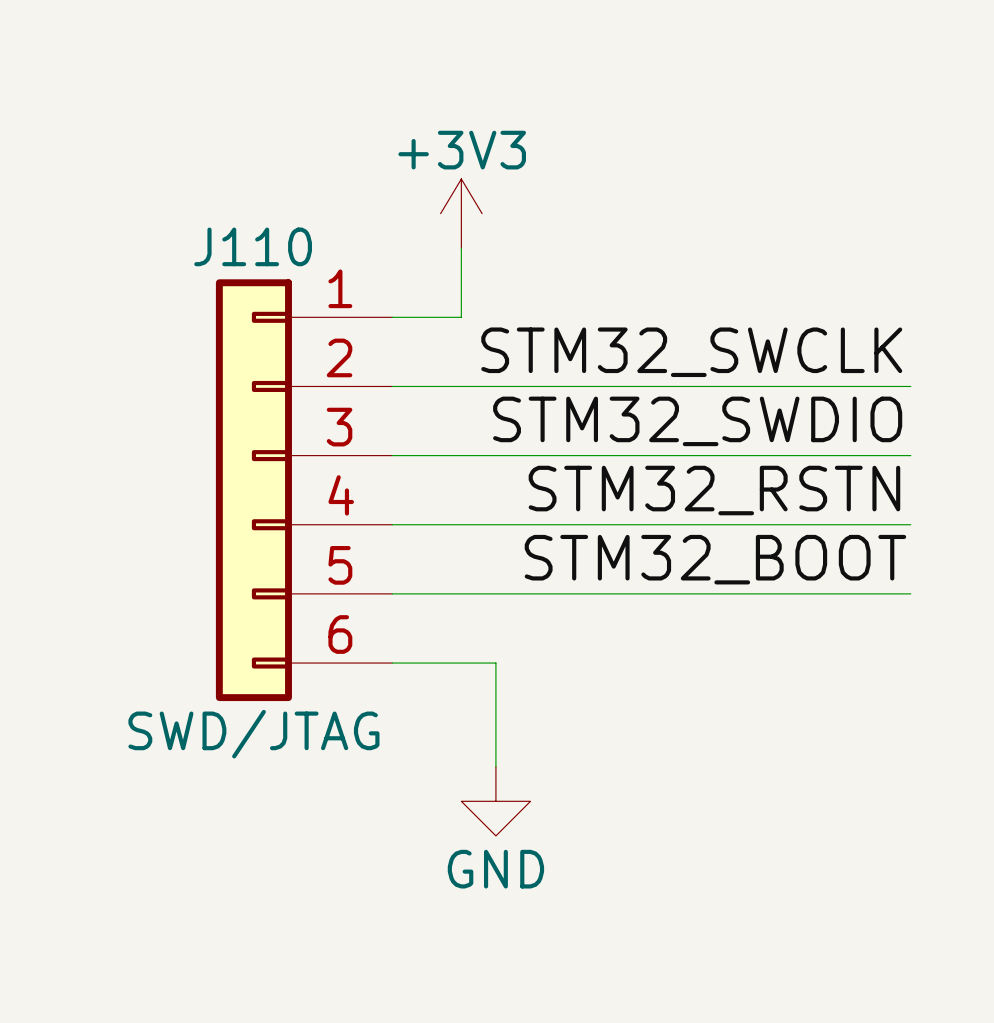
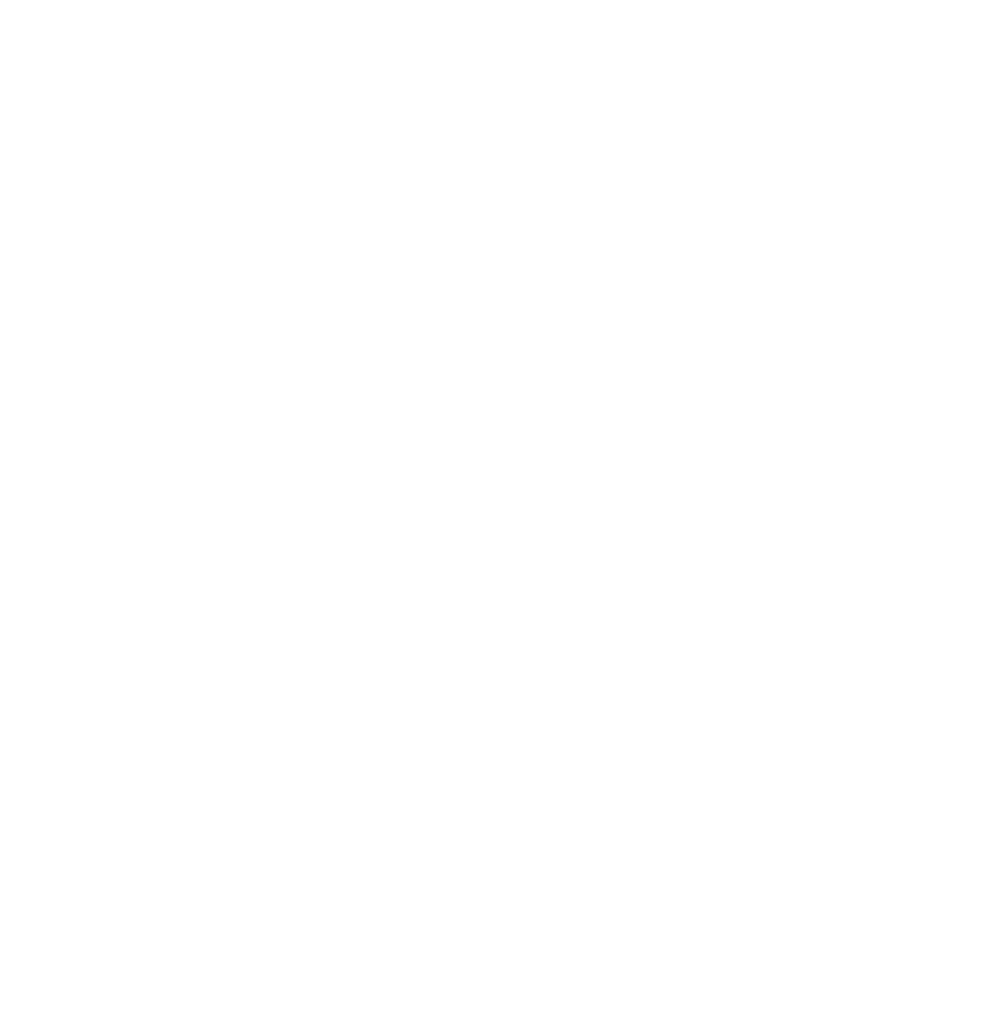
power symbol: +3V3 (461, 213) -> none
wire: (461, 248) (461, 317) (392, 317) -> none
label: STM32_SWCLK (691, 352) -> none
wire: (392, 386) (910, 386) -> none
label: STM32_SWDIO (697, 421) -> none
wire: (392, 455) (910, 455) -> none
J110: SWD/JTAG (304, 490) -> none
label: STM32_RSTN (714, 490) -> none
wire: (392, 524) (910, 524) -> none
label: STM32_BOOT (715, 559) -> none
wire: (392, 593) (910, 593) -> none
wire: (392, 663) (495, 663) (495, 766) -> none
power symbol: GND (495, 801) -> none

